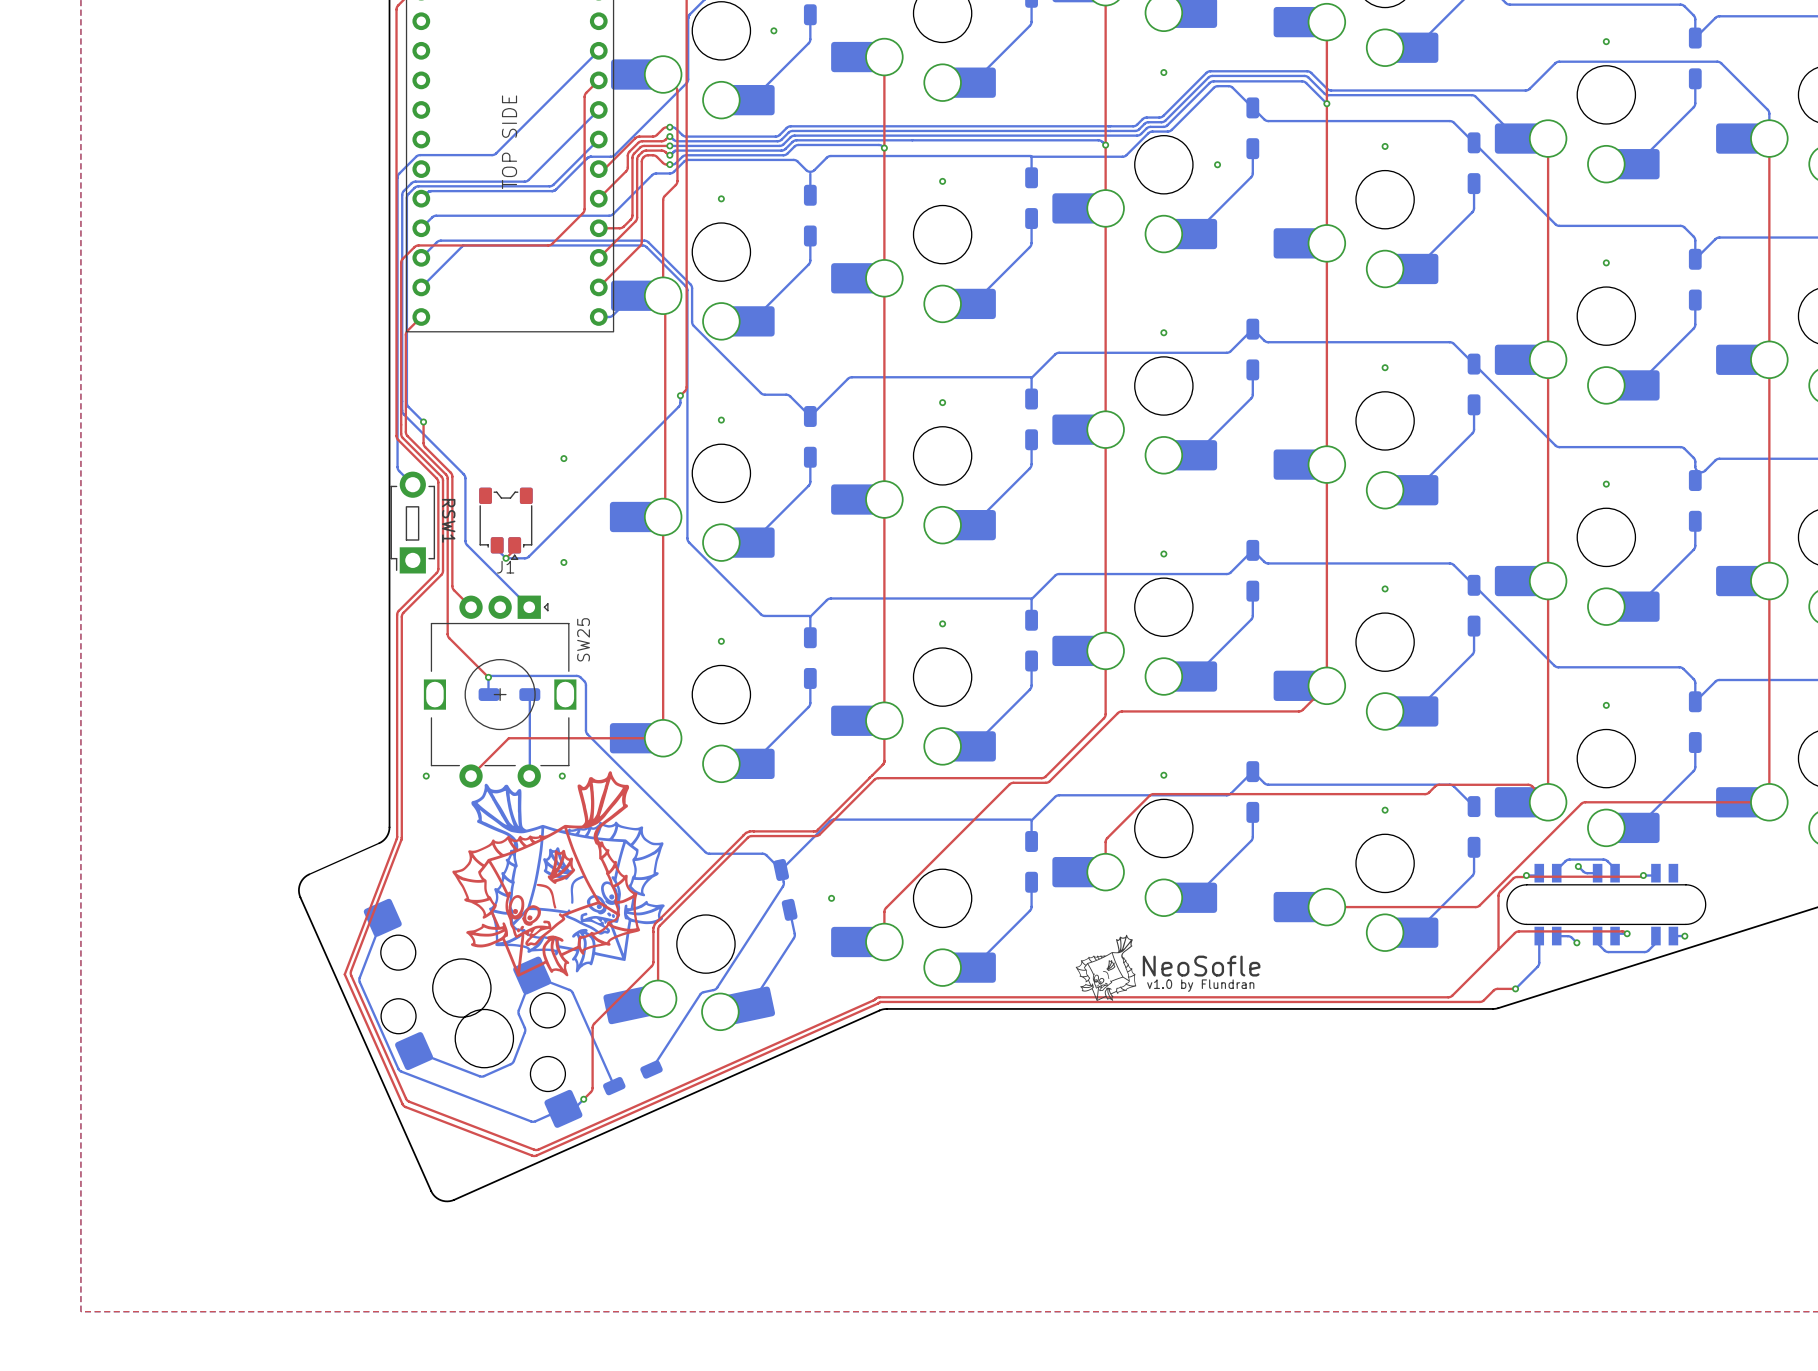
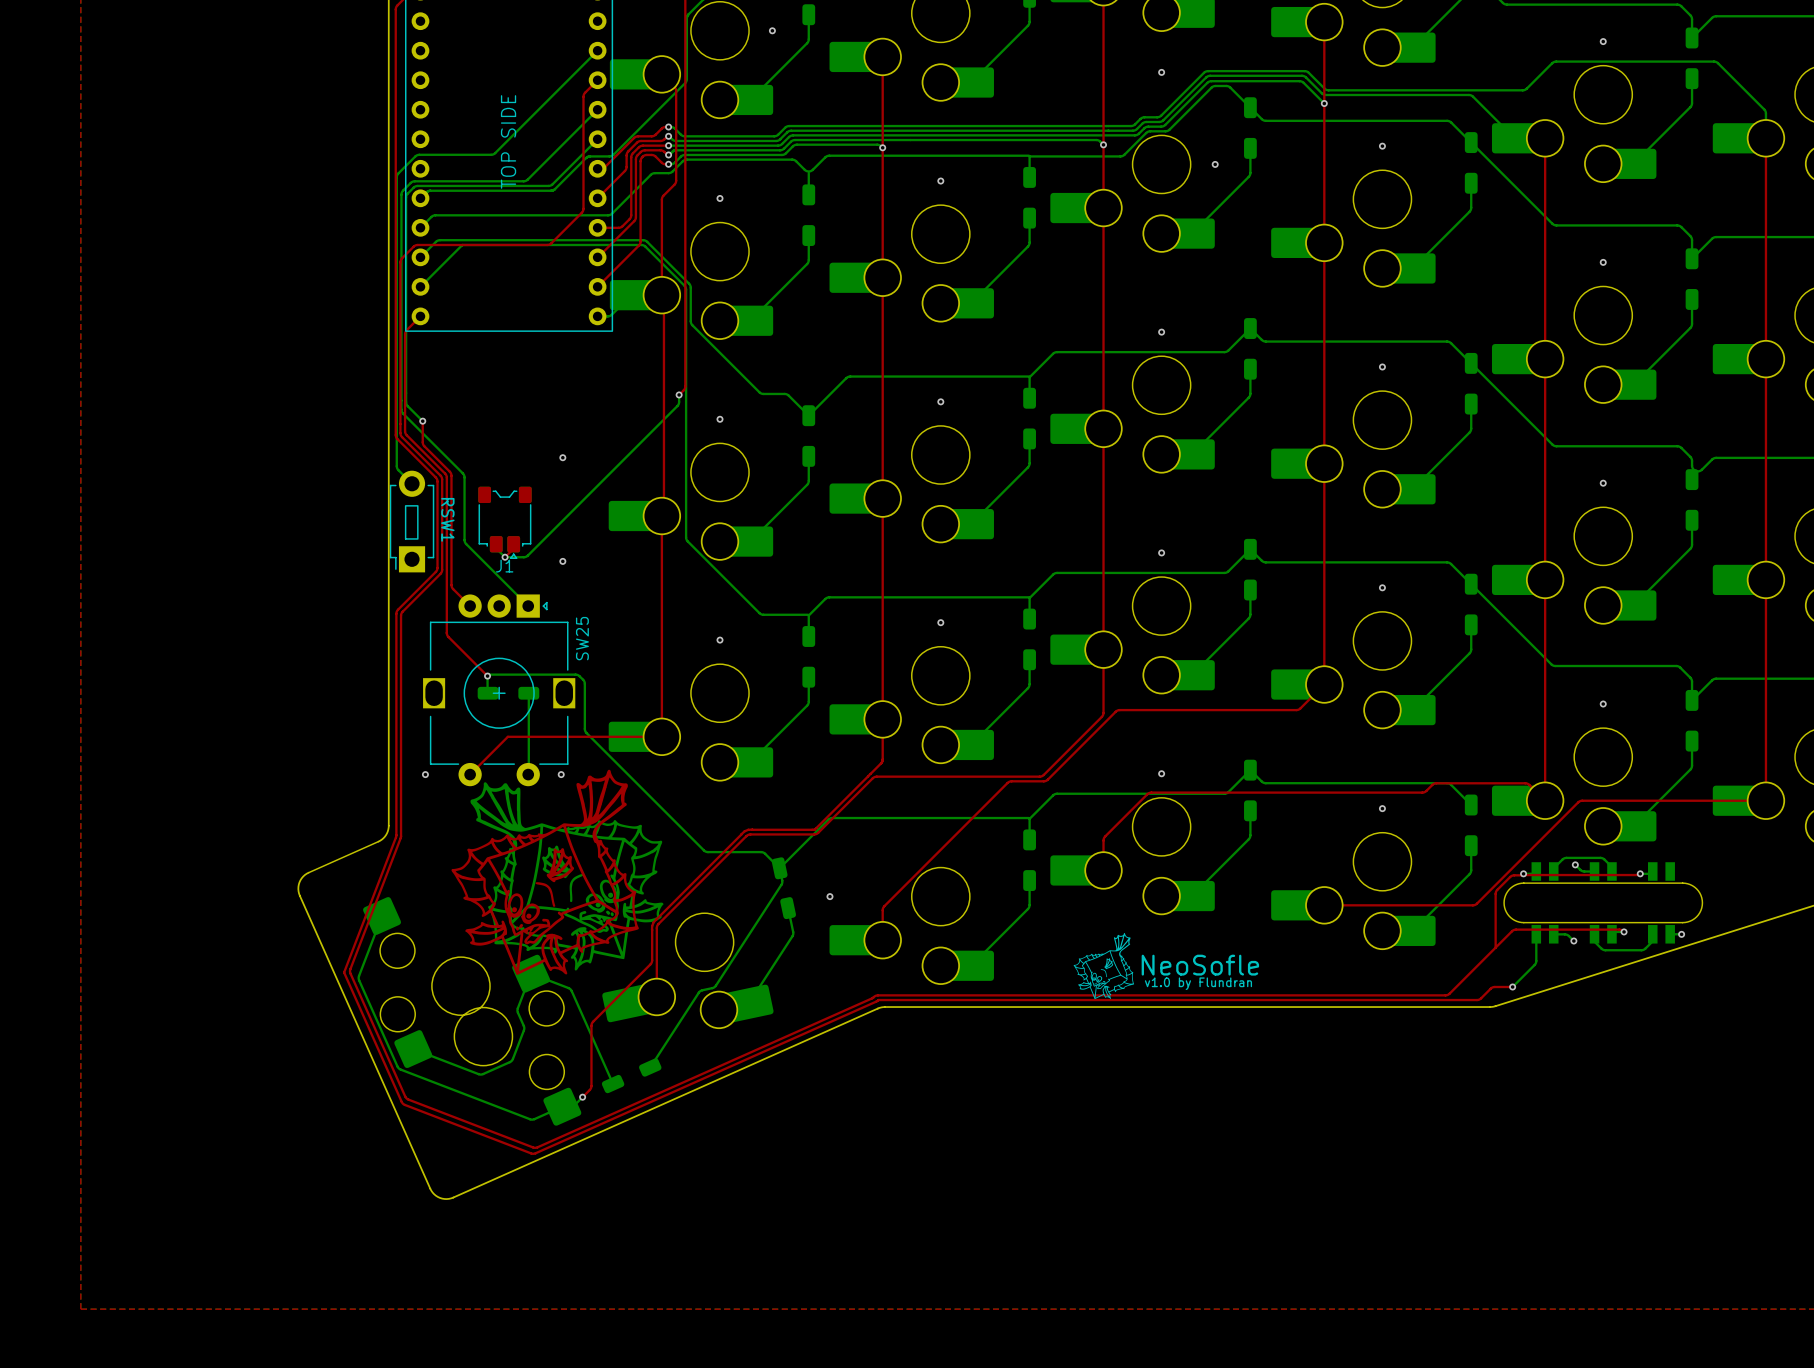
drawing: [1142, 955, 1261, 977] -> none
text: none -> NeoSofle (1200, 965)

